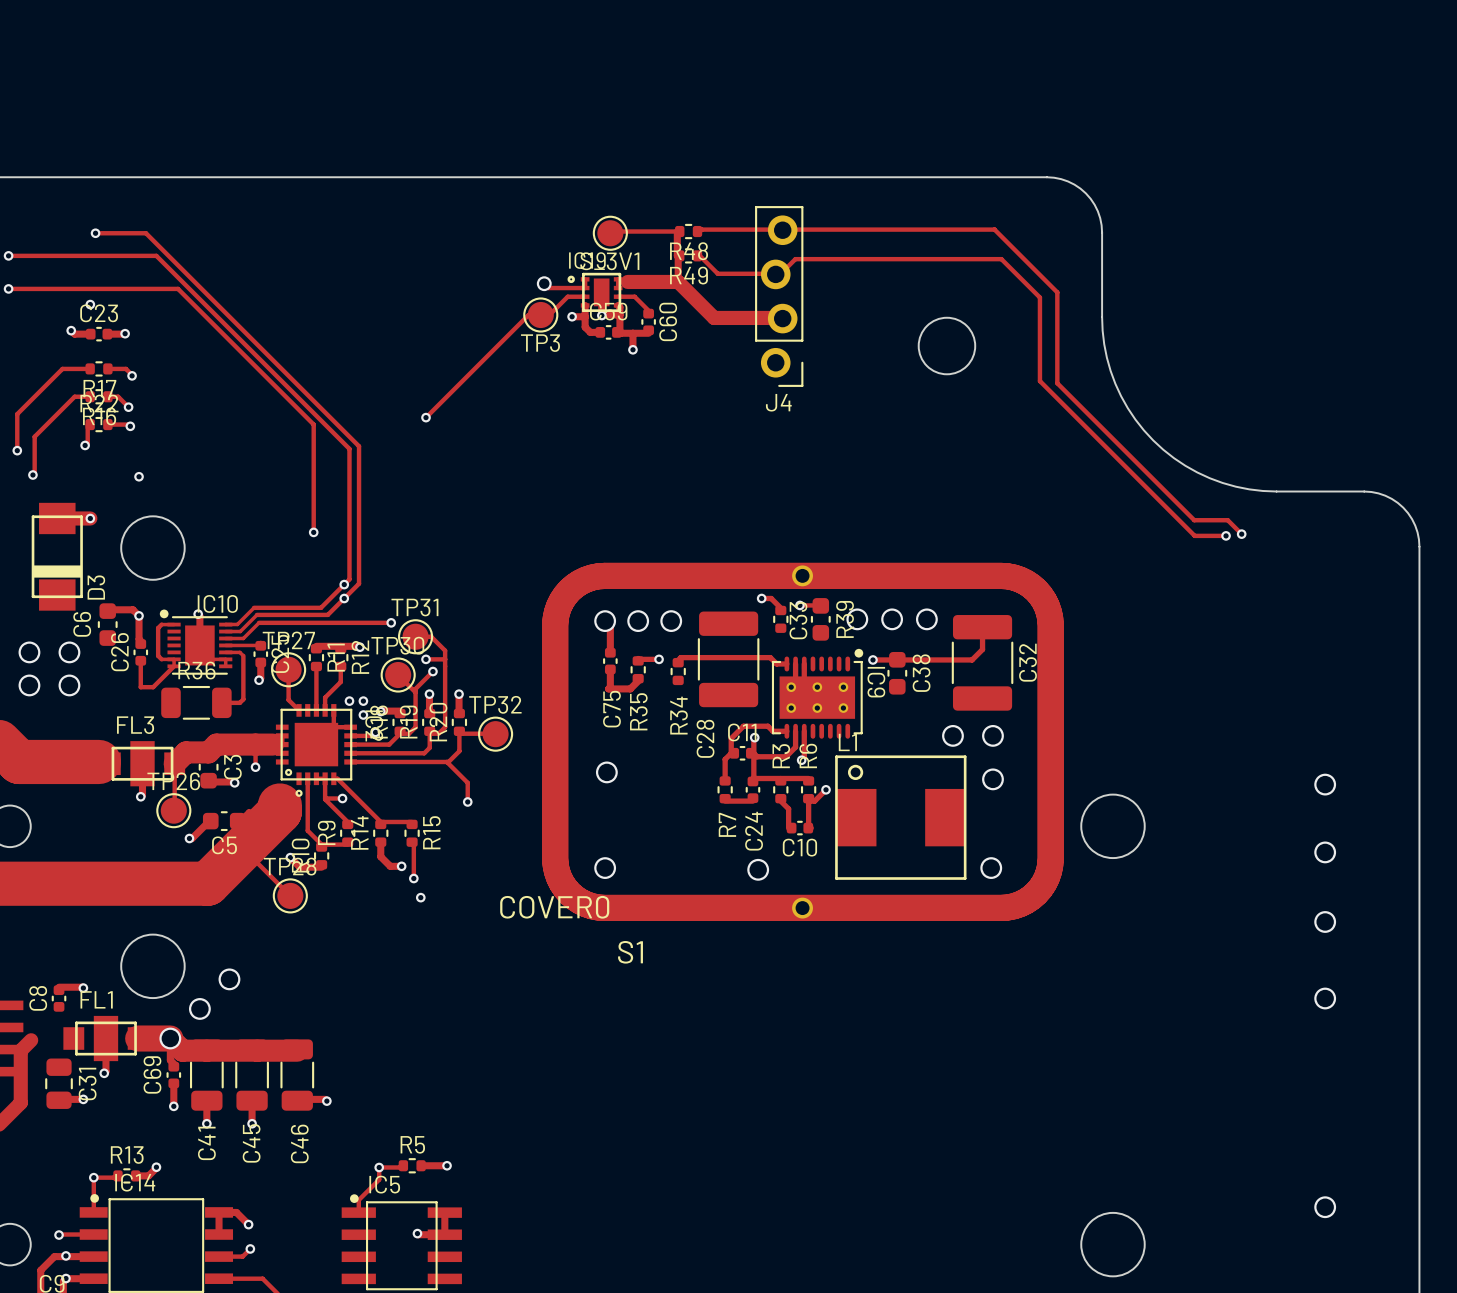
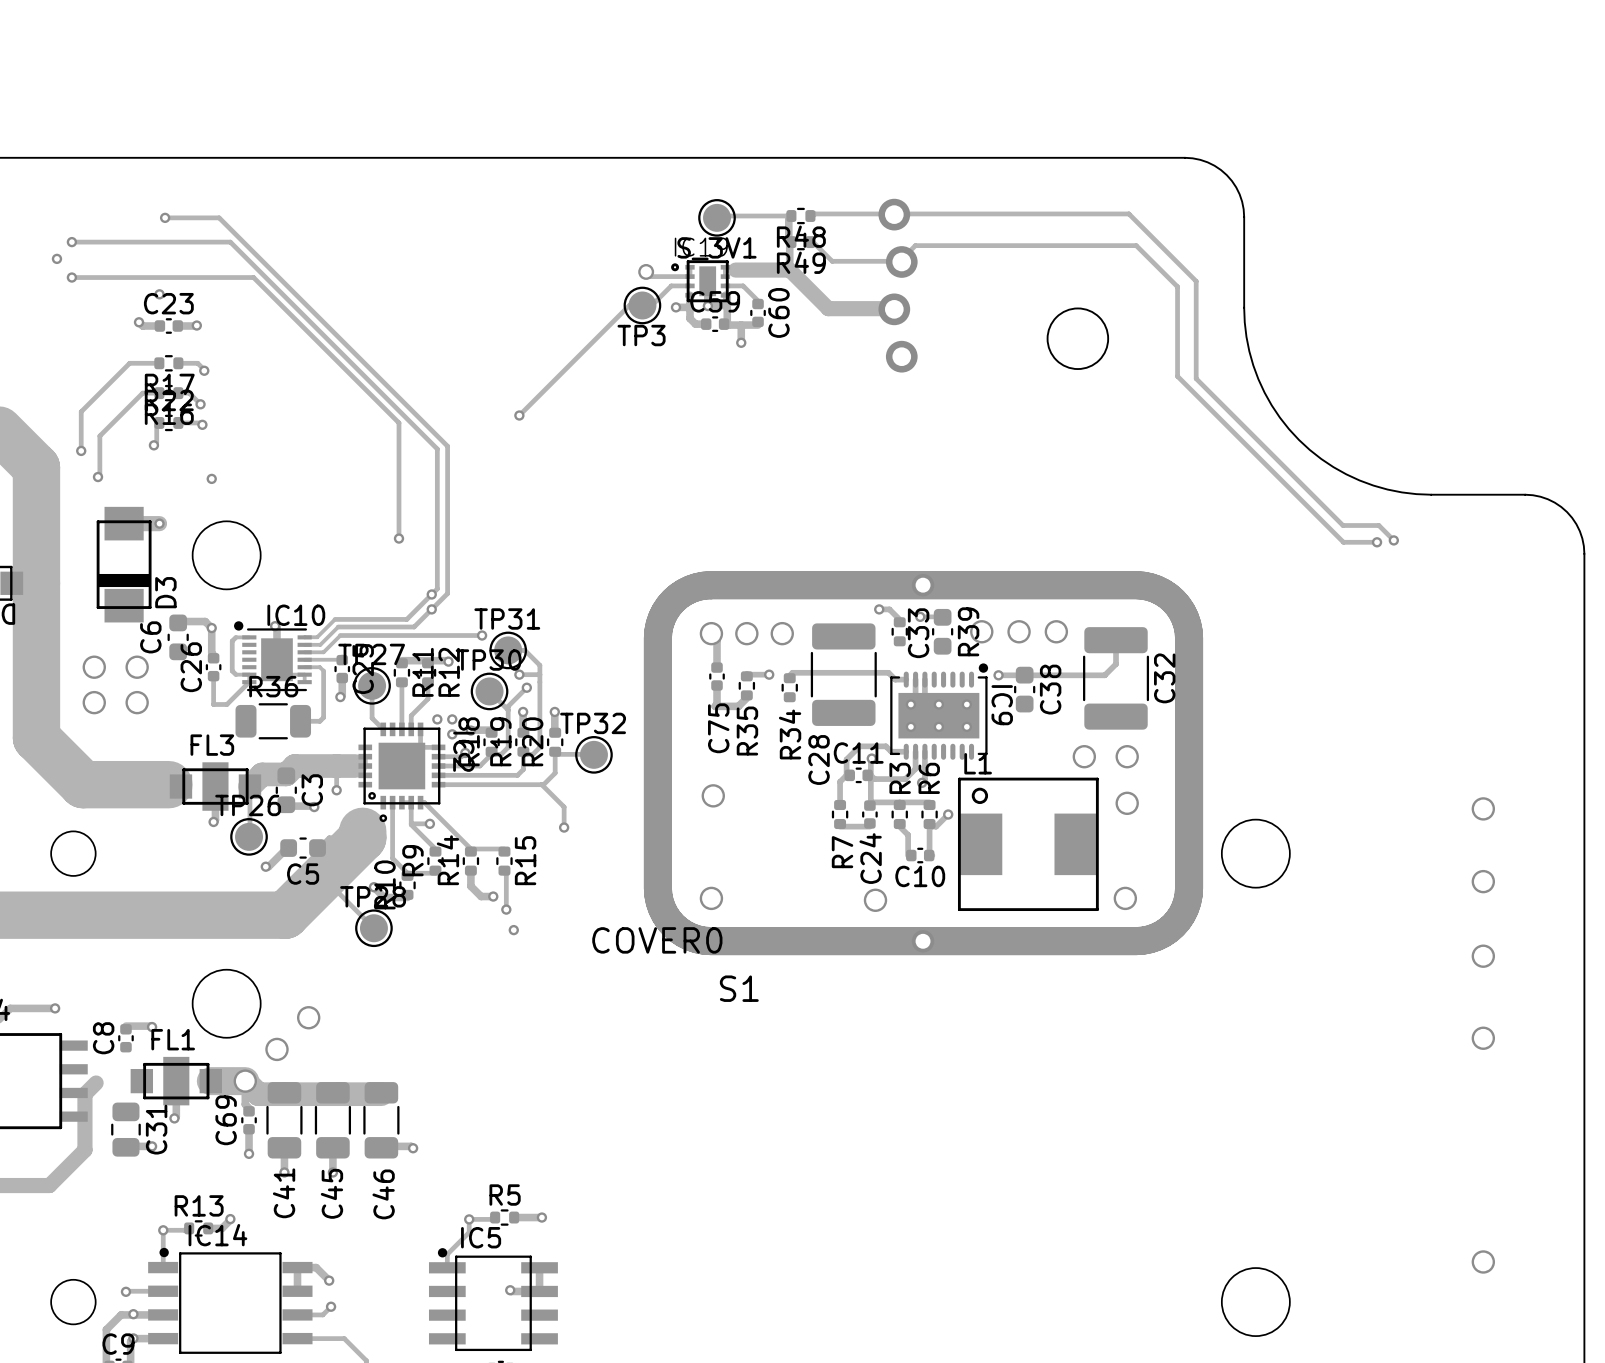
J4 side: top (779, 296) -> bottom (898, 285)

